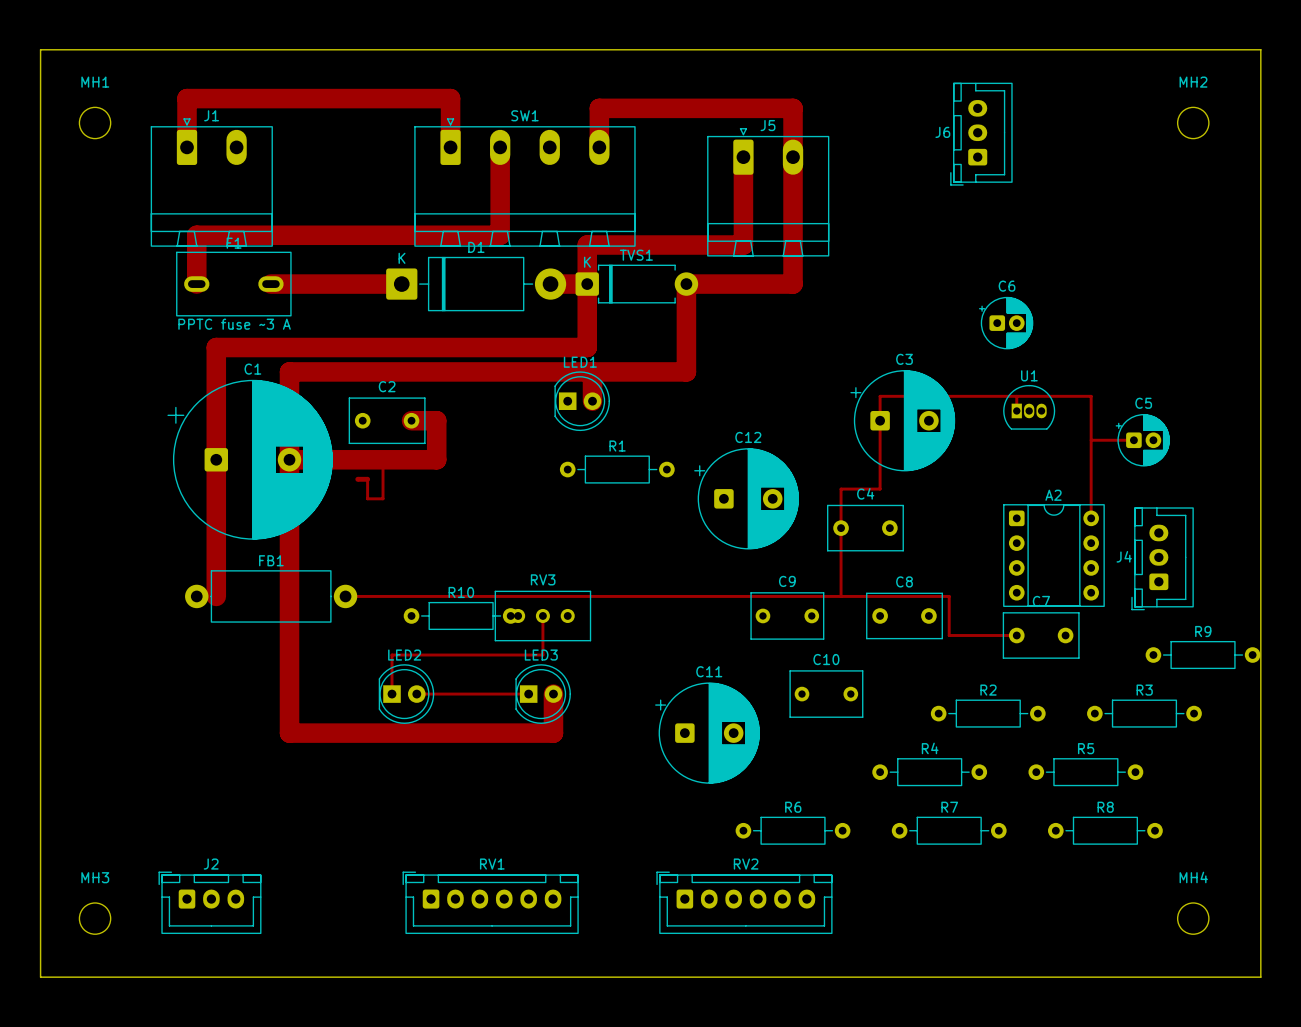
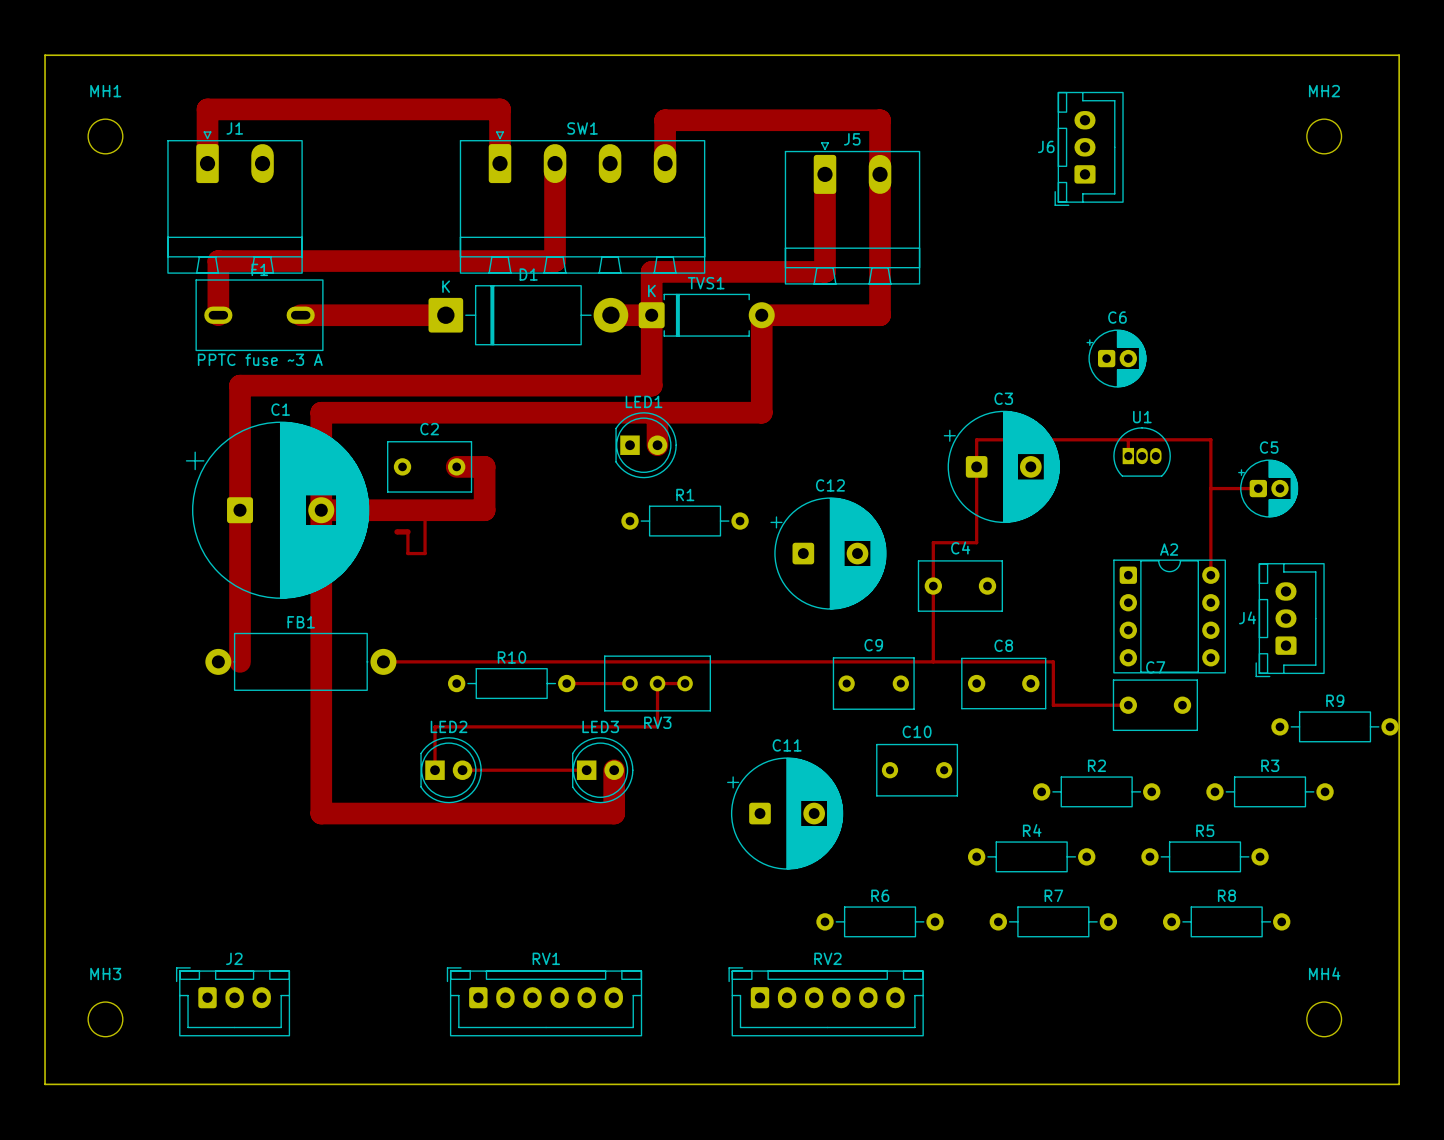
RV3 name position: RV3 (543, 579) -> RV3 (657, 722)
top track: none -> (566, 683) (630, 683)
top track: (542, 615) (542, 655) -> (685, 683) (657, 683) (657, 726) (602, 726)
RV3 position: (542, 616) -> (657, 683)

